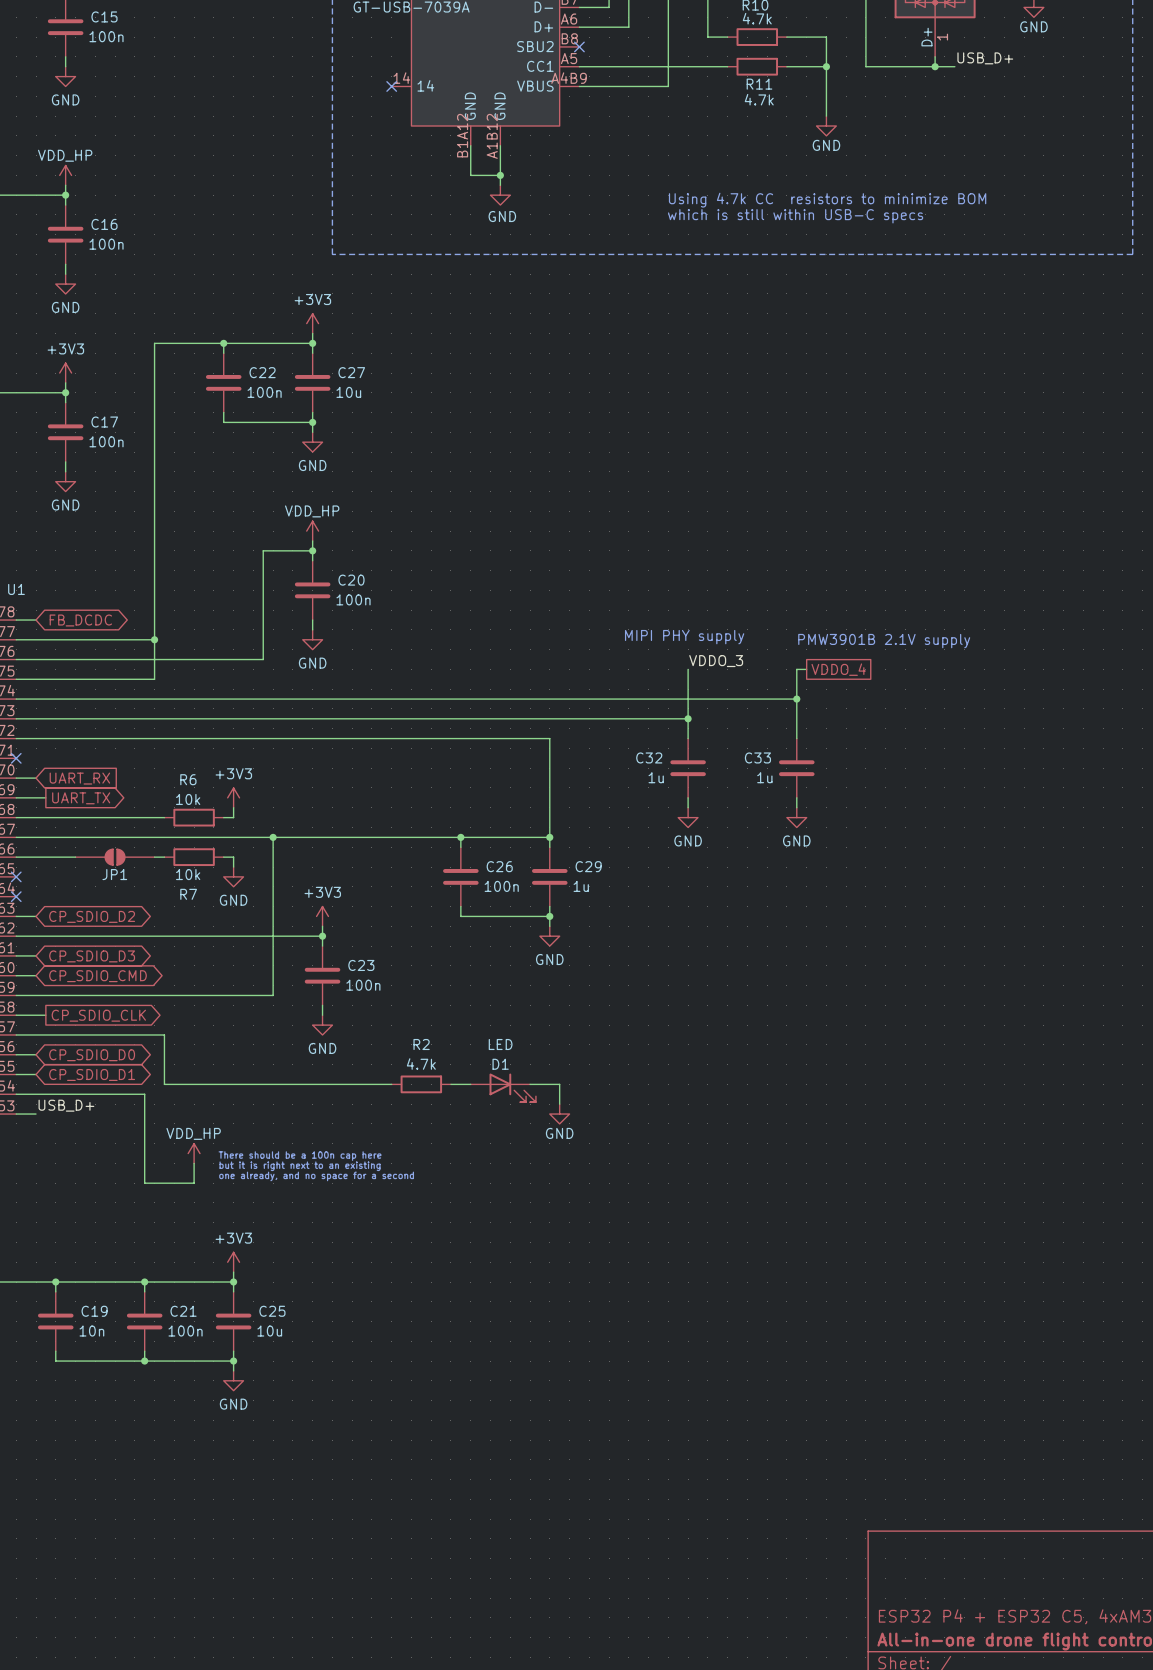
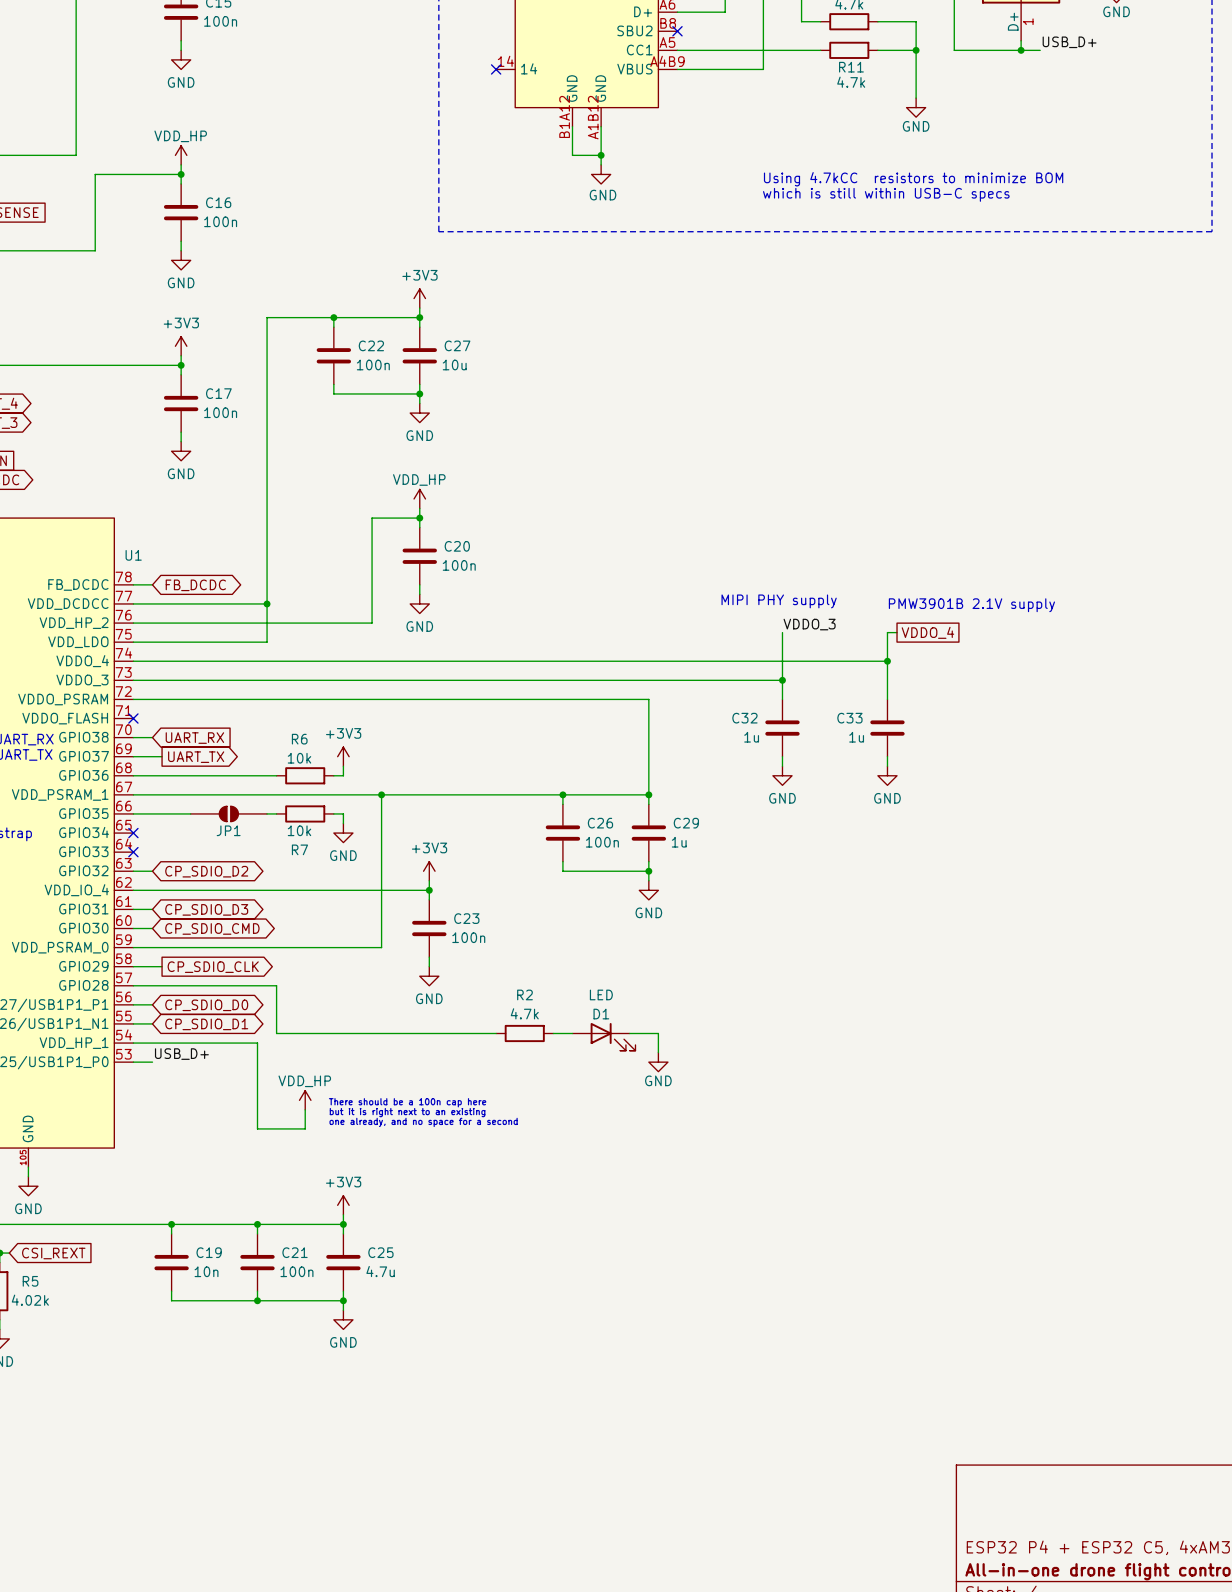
text: Using 4.7k CC resistors to minimize BOM (827, 200) -> Using 4.7kCC resistors to minimize BOM (913, 179)
C25 value: 10u (269, 1331) -> 4.7u (380, 1271)

